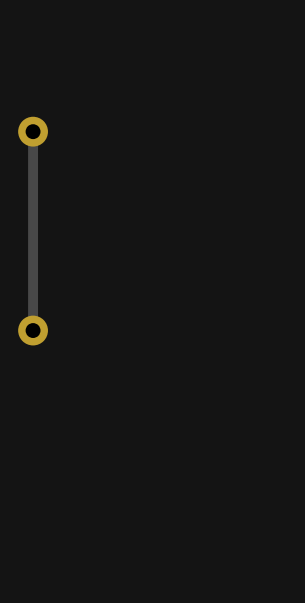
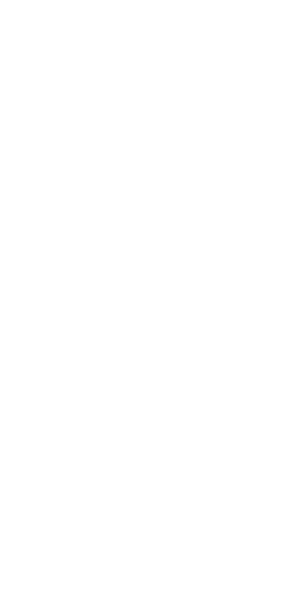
track: (33, 131) (33, 330) -> none
via: (33, 131) -> none
via: (33, 330) -> none

